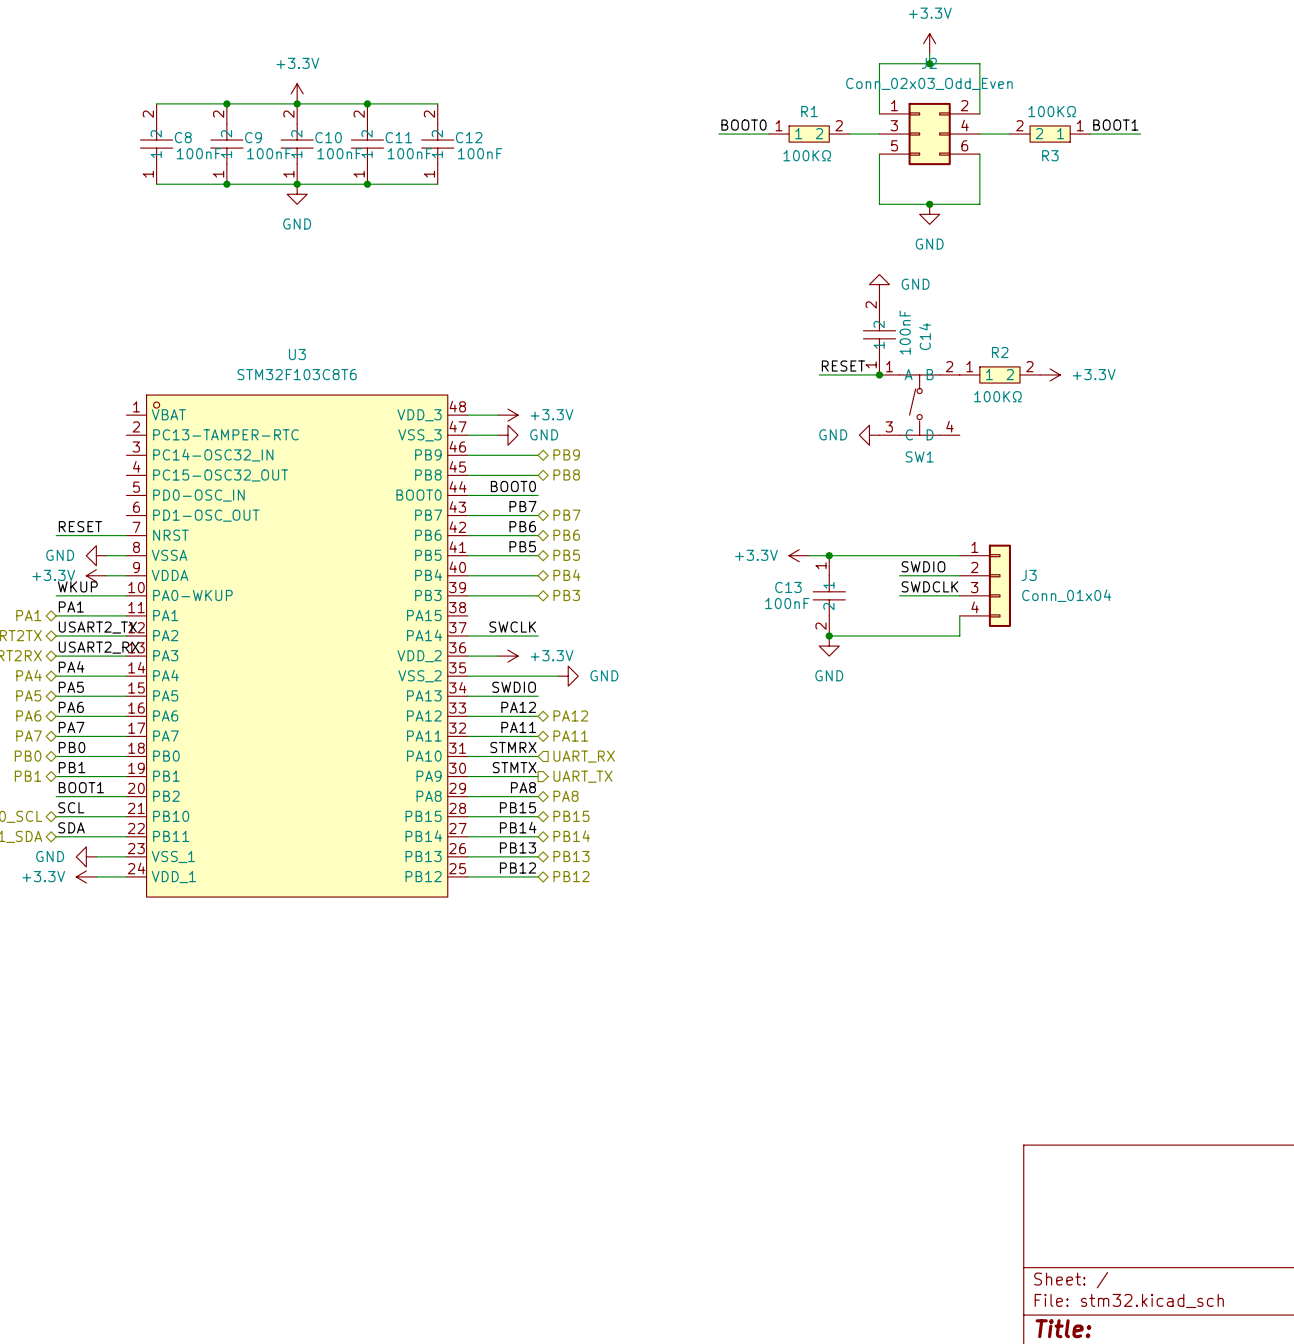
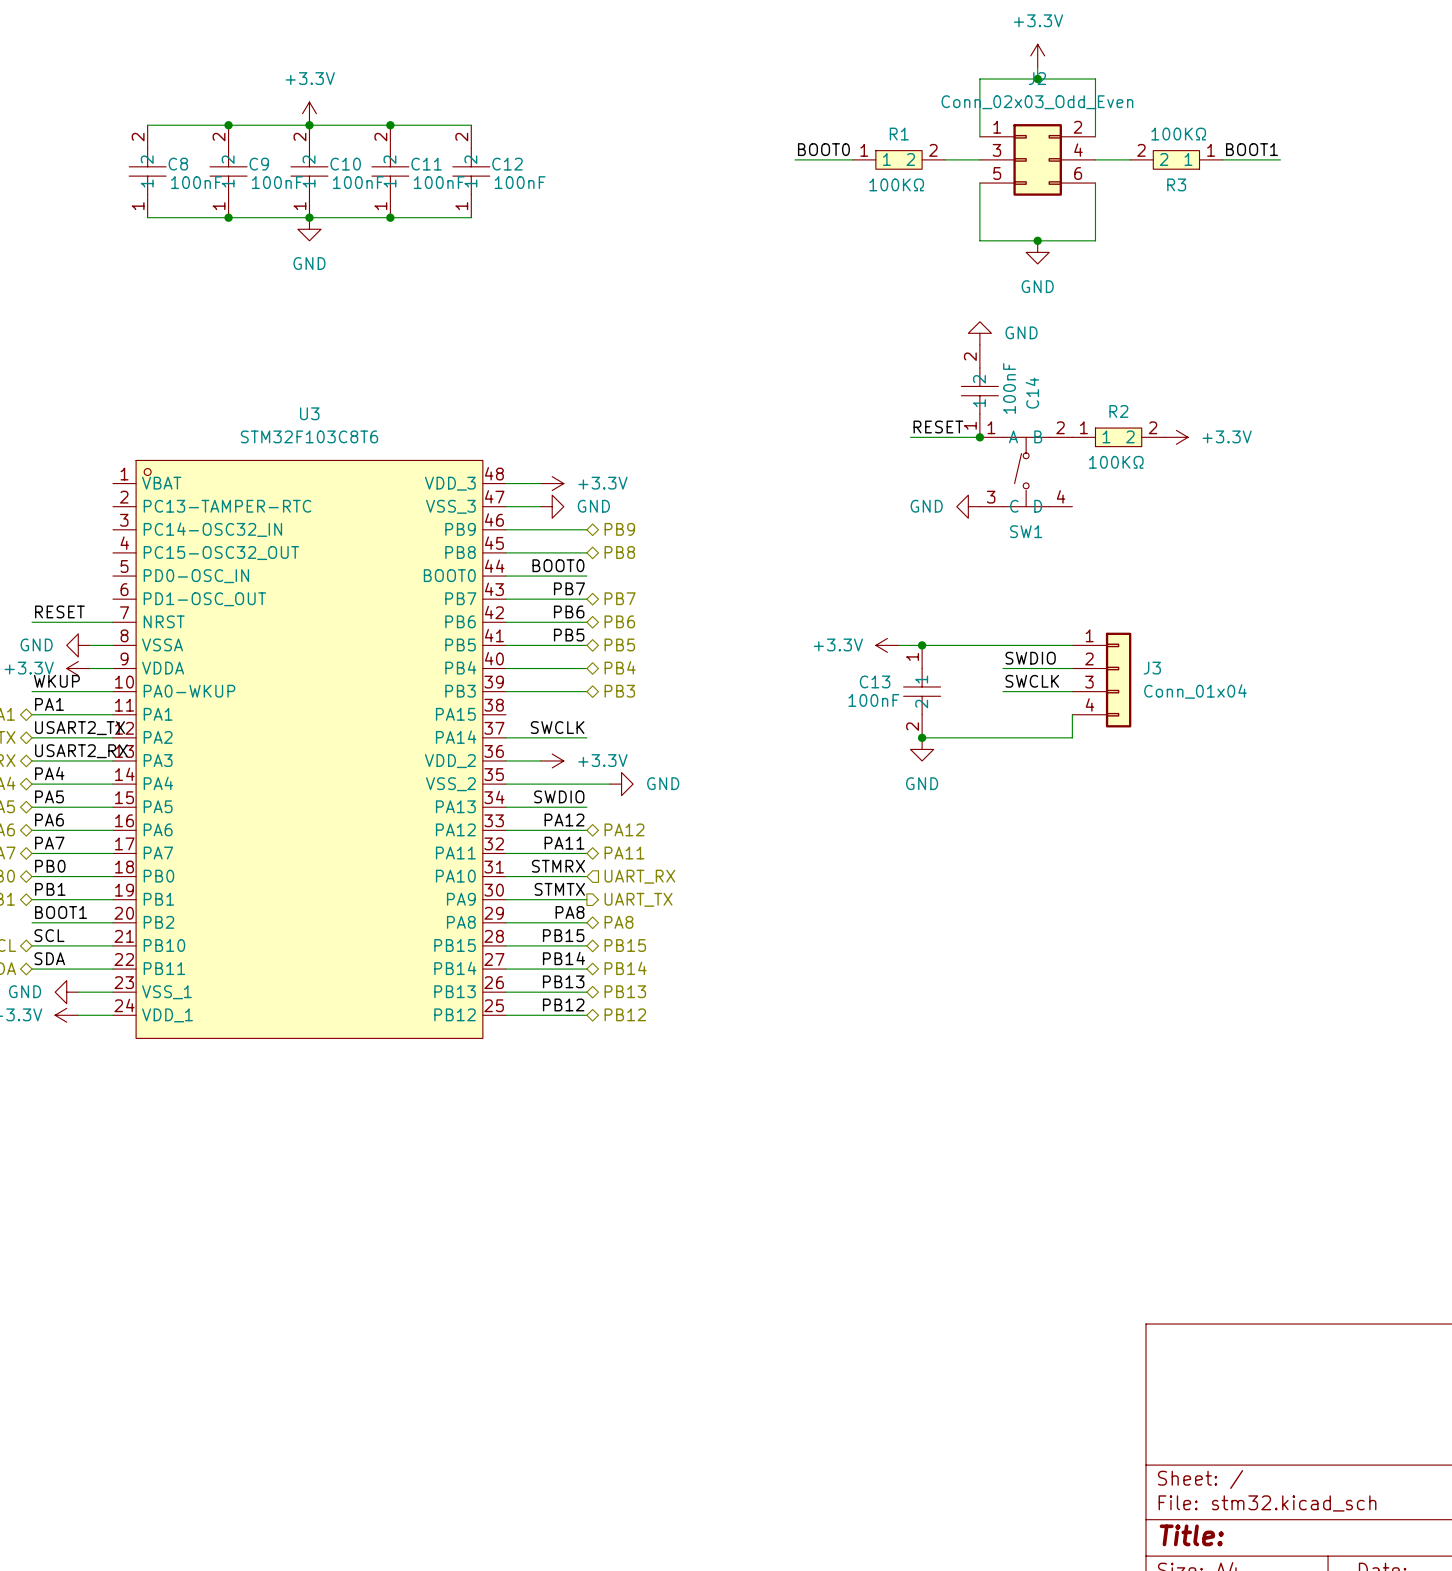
label: SWDCLK (929, 586) -> SWCLK (1032, 681)

